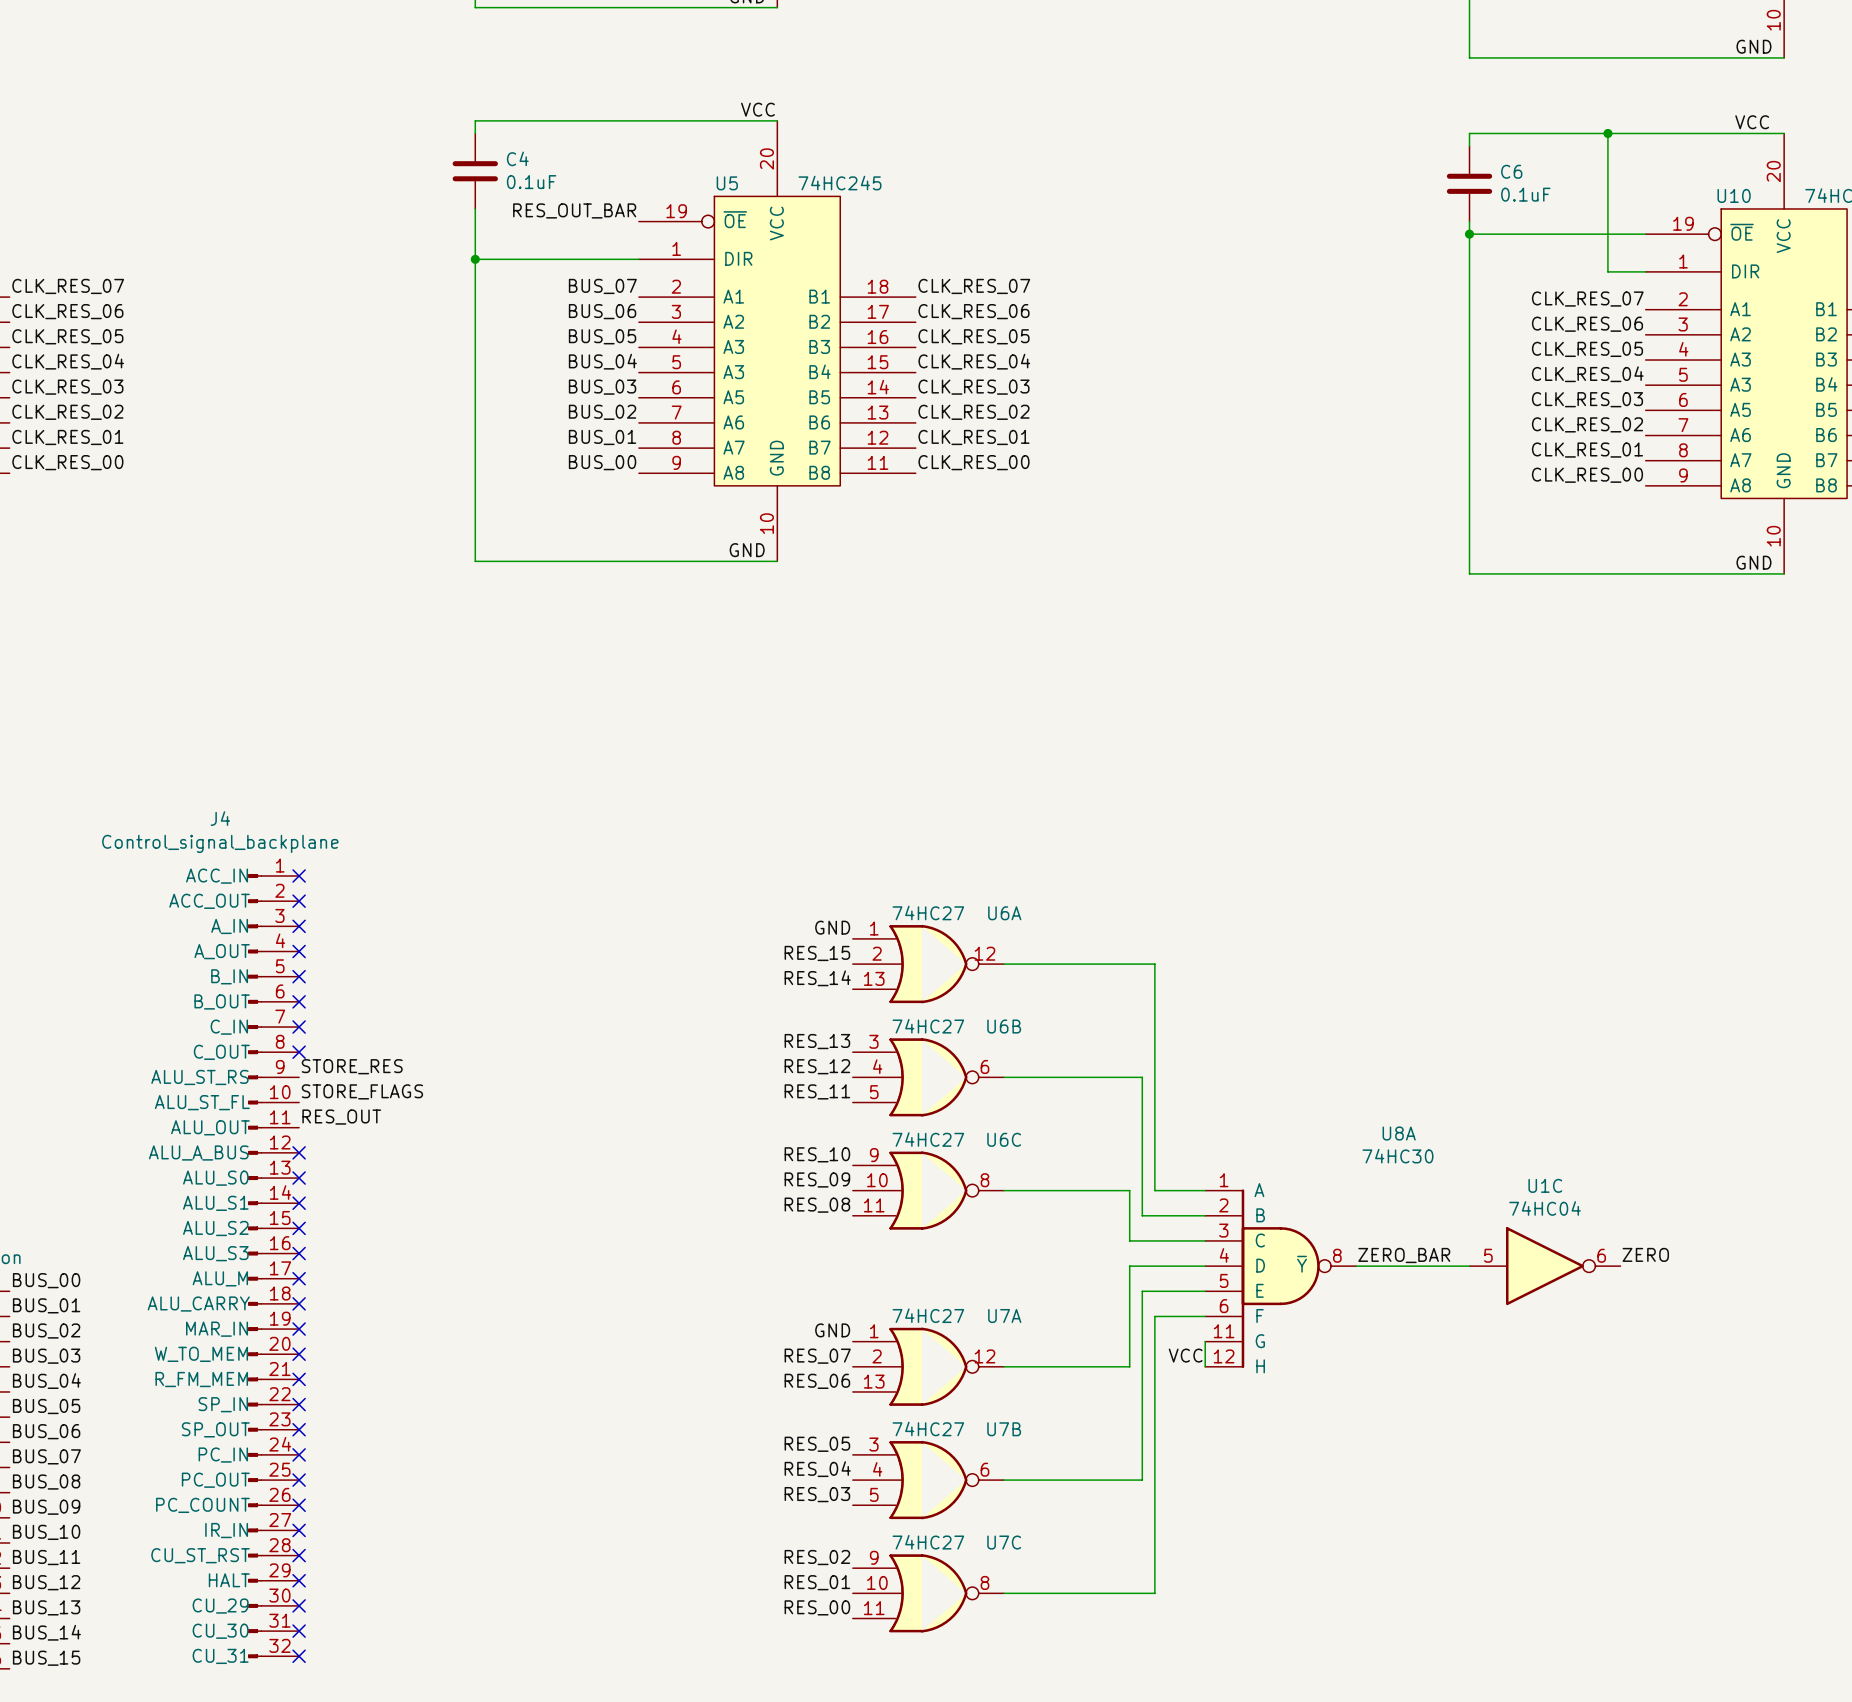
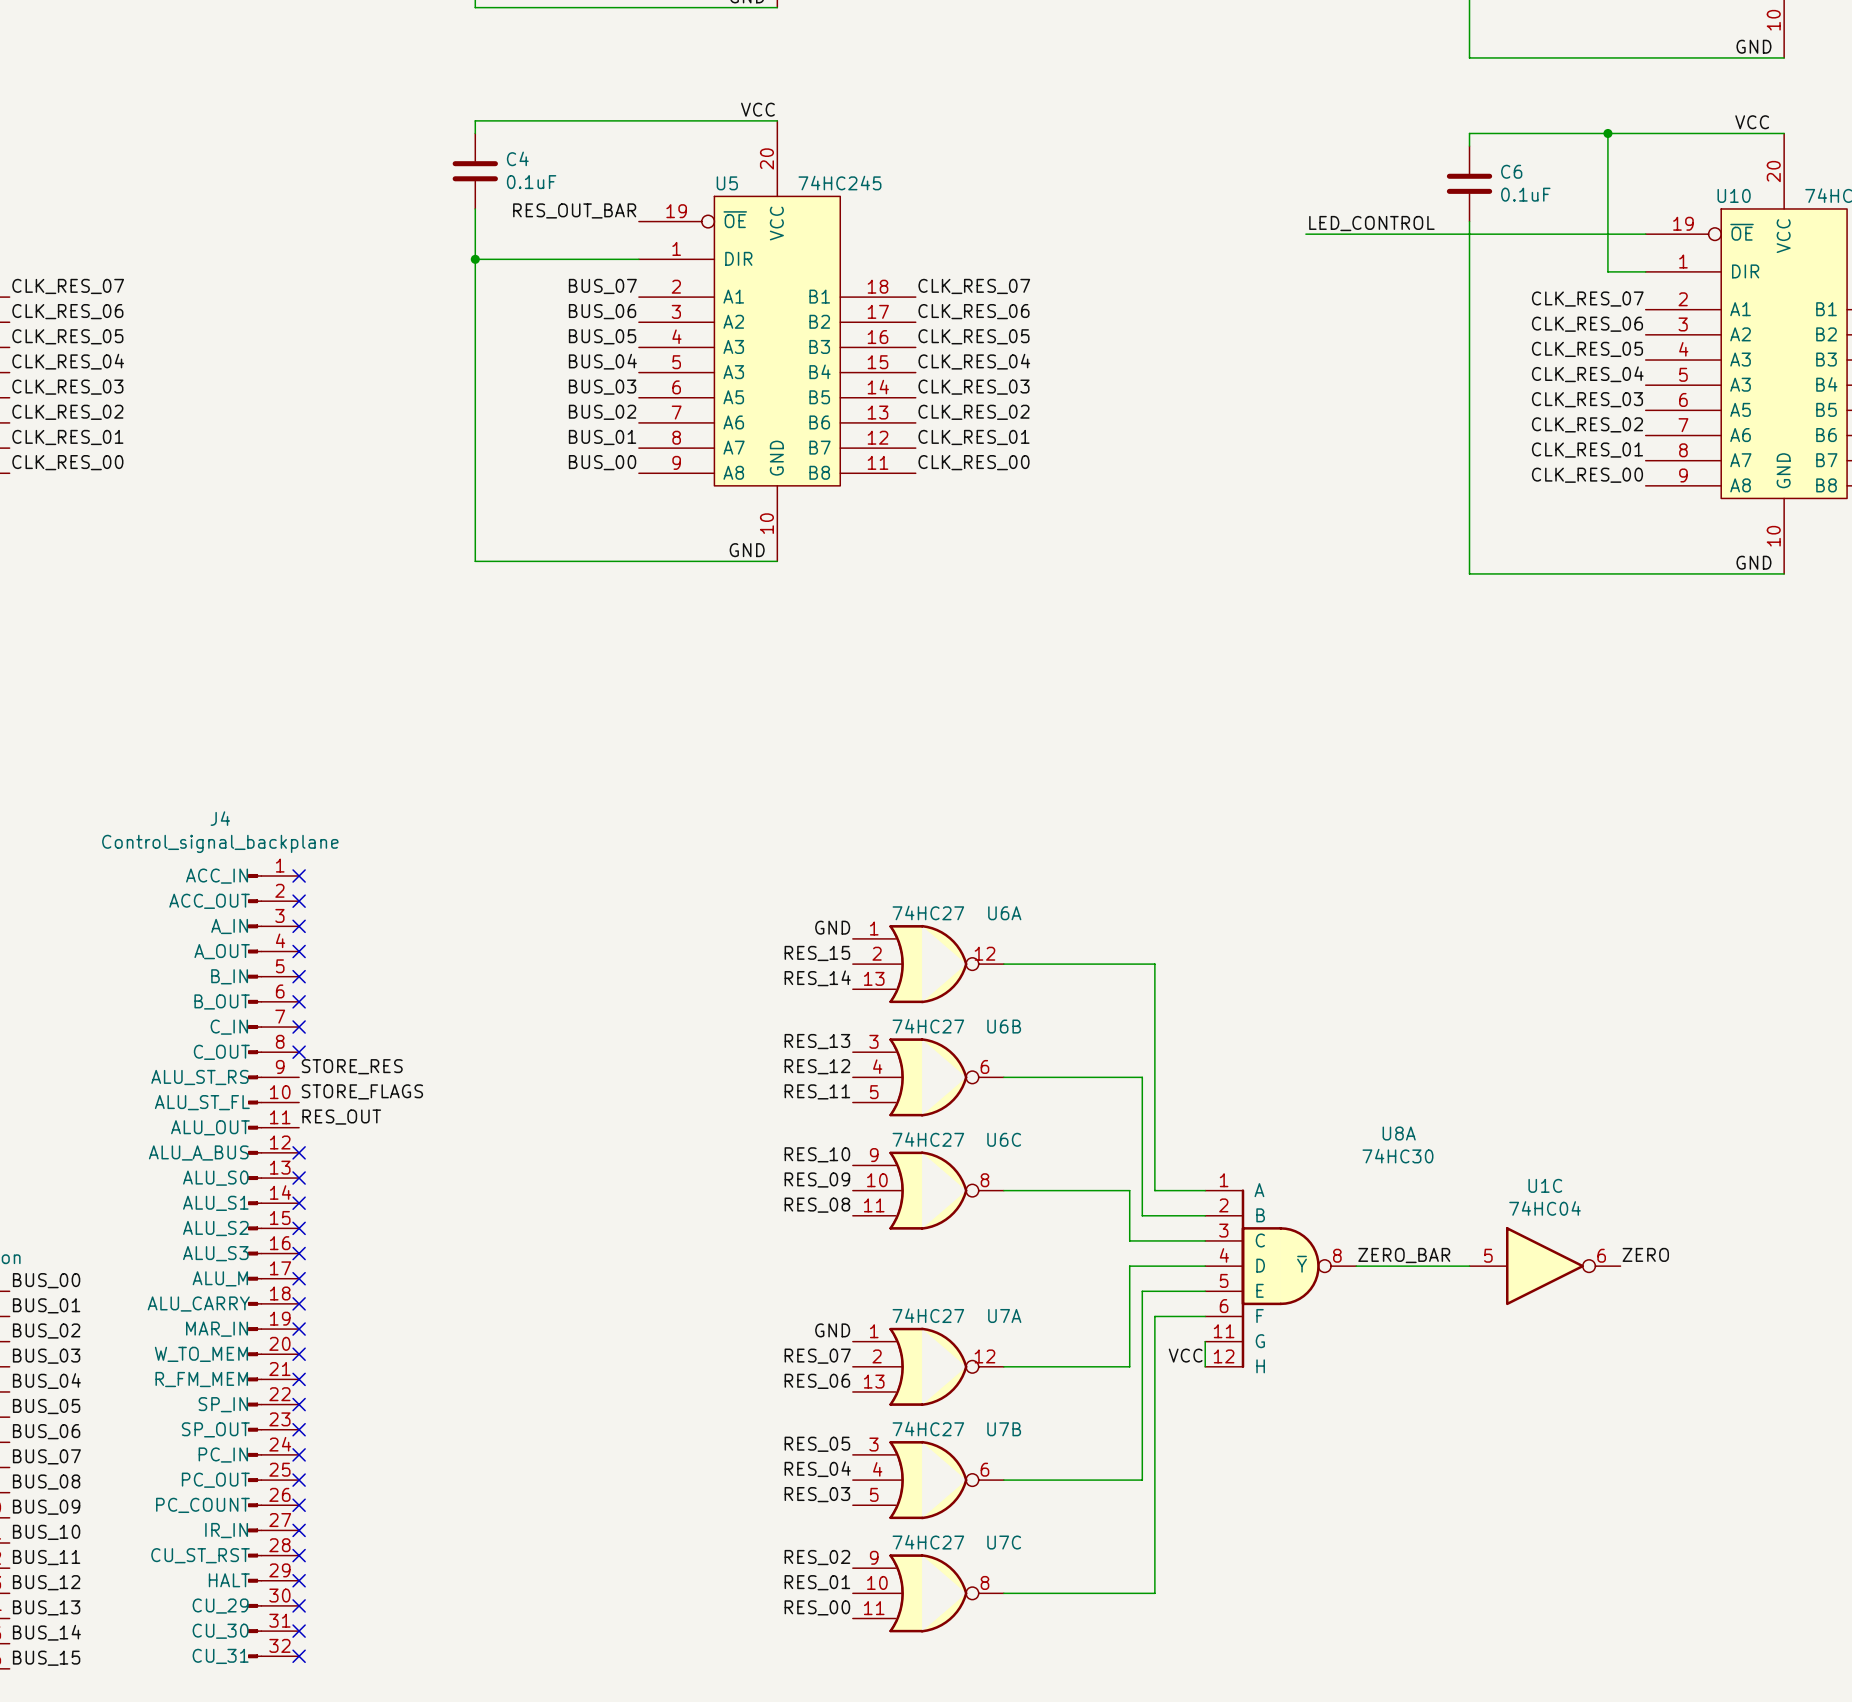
label: none -> LED_CONTROL (1371, 223)
wire: none -> (1305, 234) (1469, 234)
junction: (1469, 234) -> none

